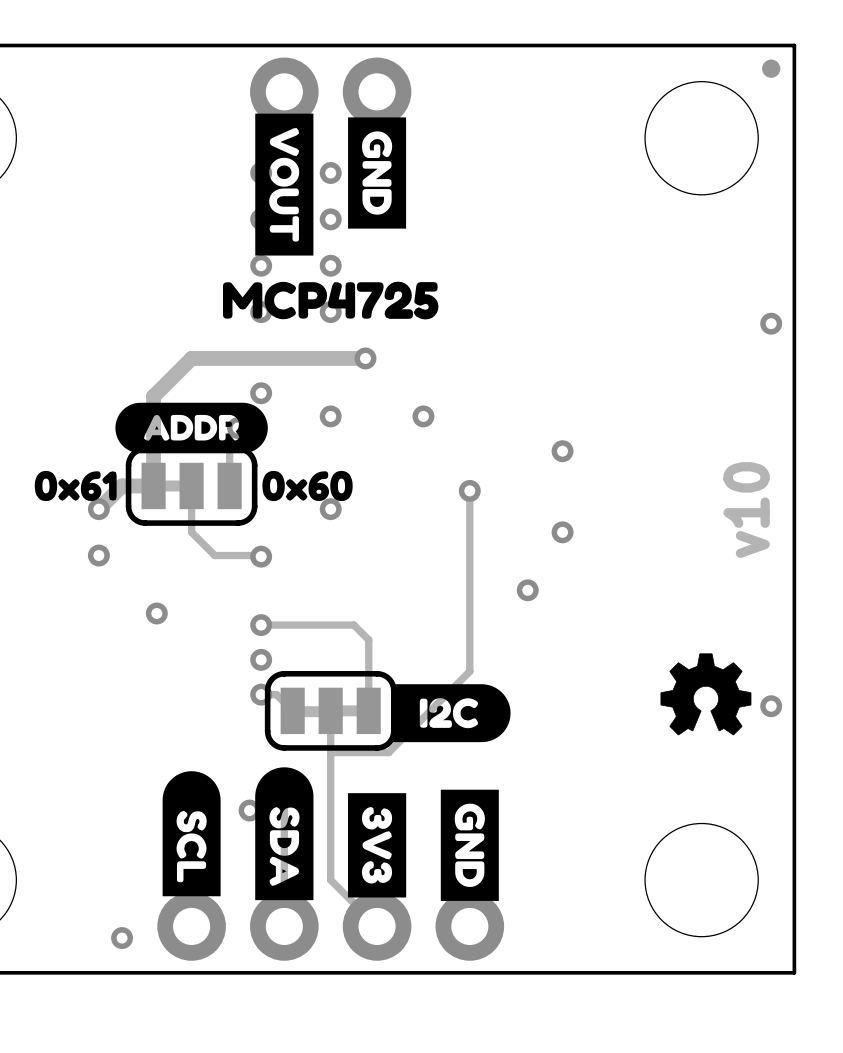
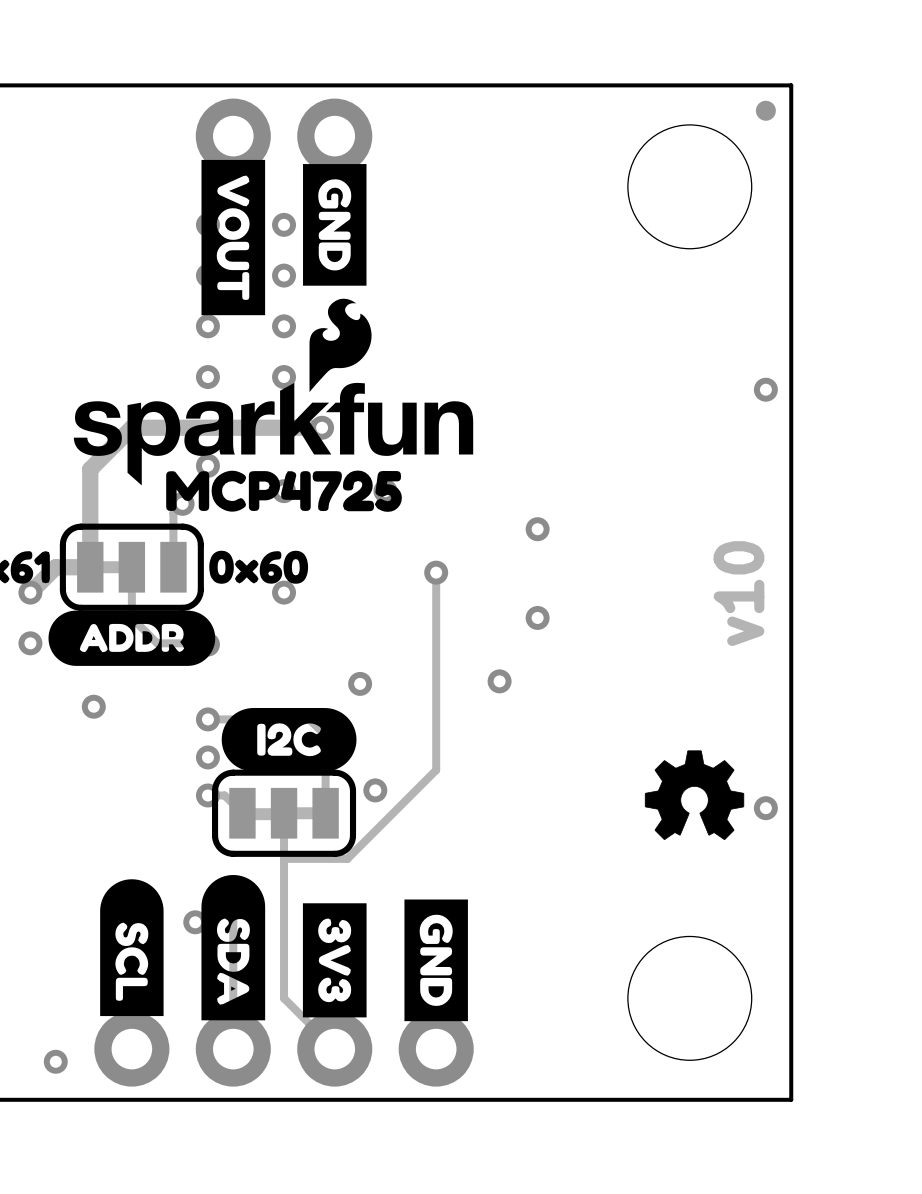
drawing: none -> [73, 298, 474, 486]
drawing position: (330, 300) -> (284, 491)
drawing position: (191, 428) -> (131, 638)
via: none -> (360, 683)
drawing: none -> [221, 708, 357, 772]
drawing: [391, 684, 511, 743] -> none
via: none -> (375, 790)

